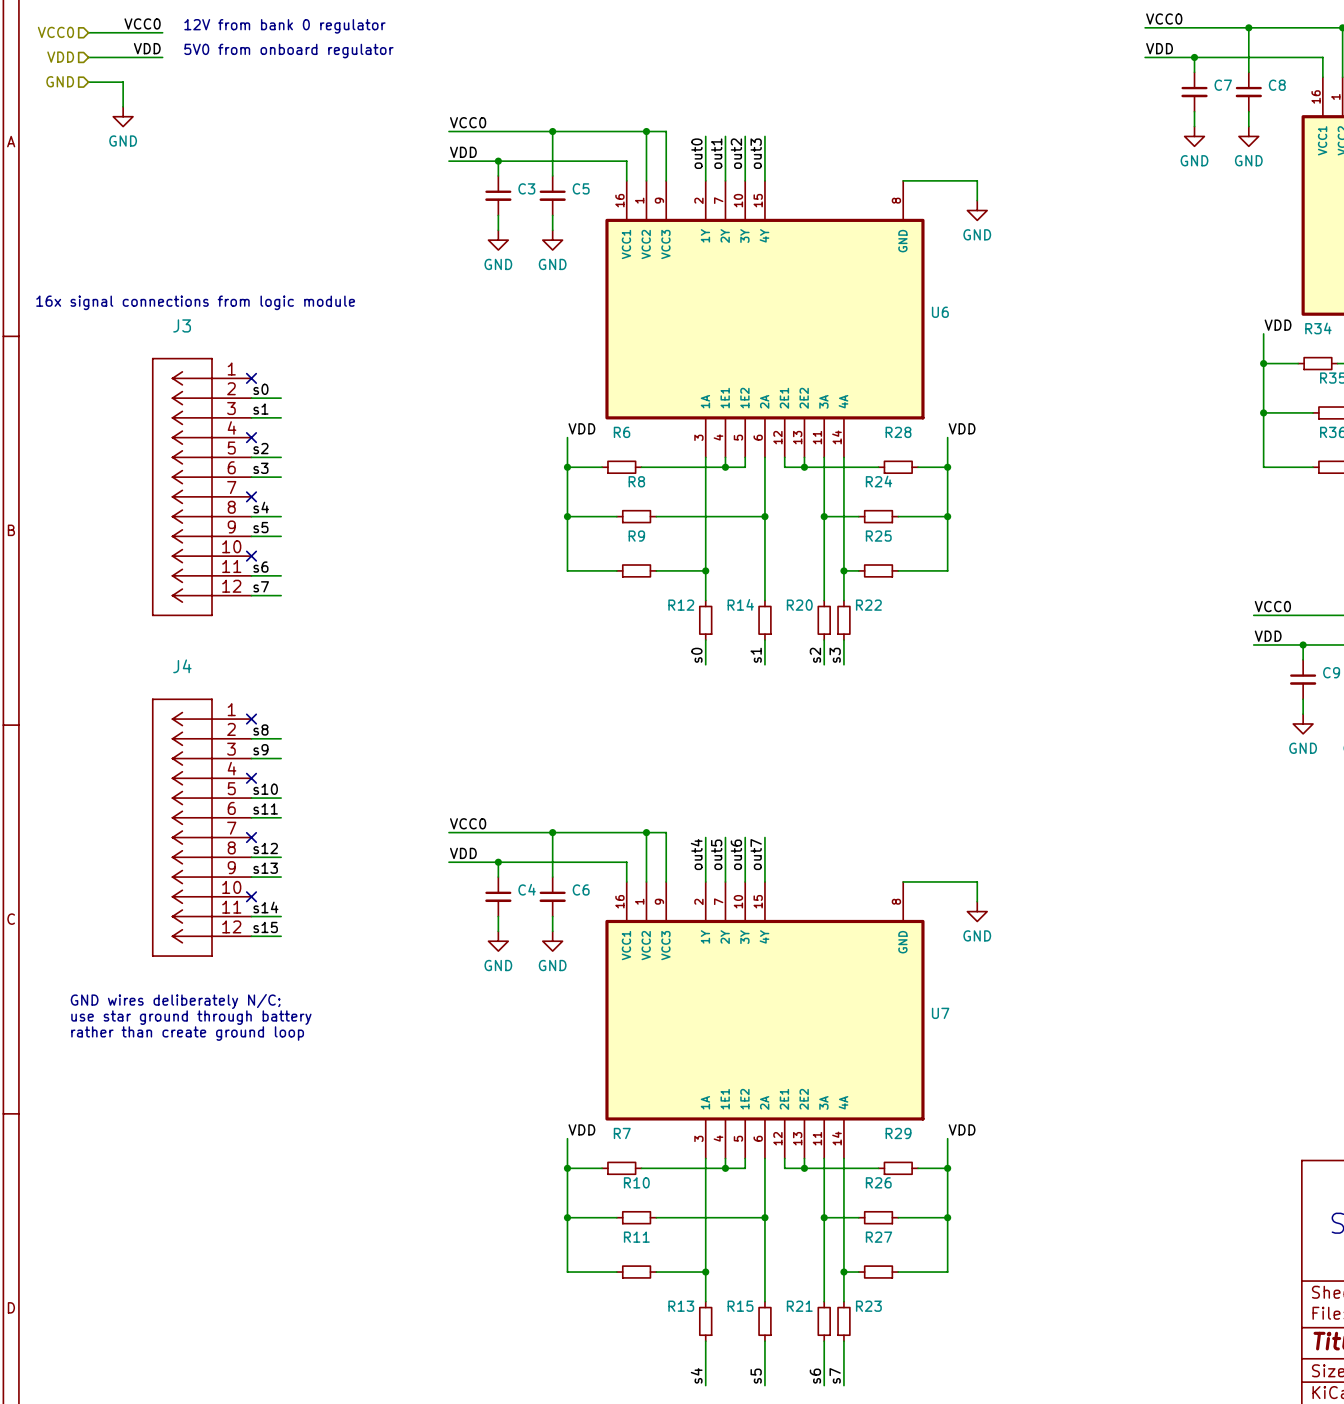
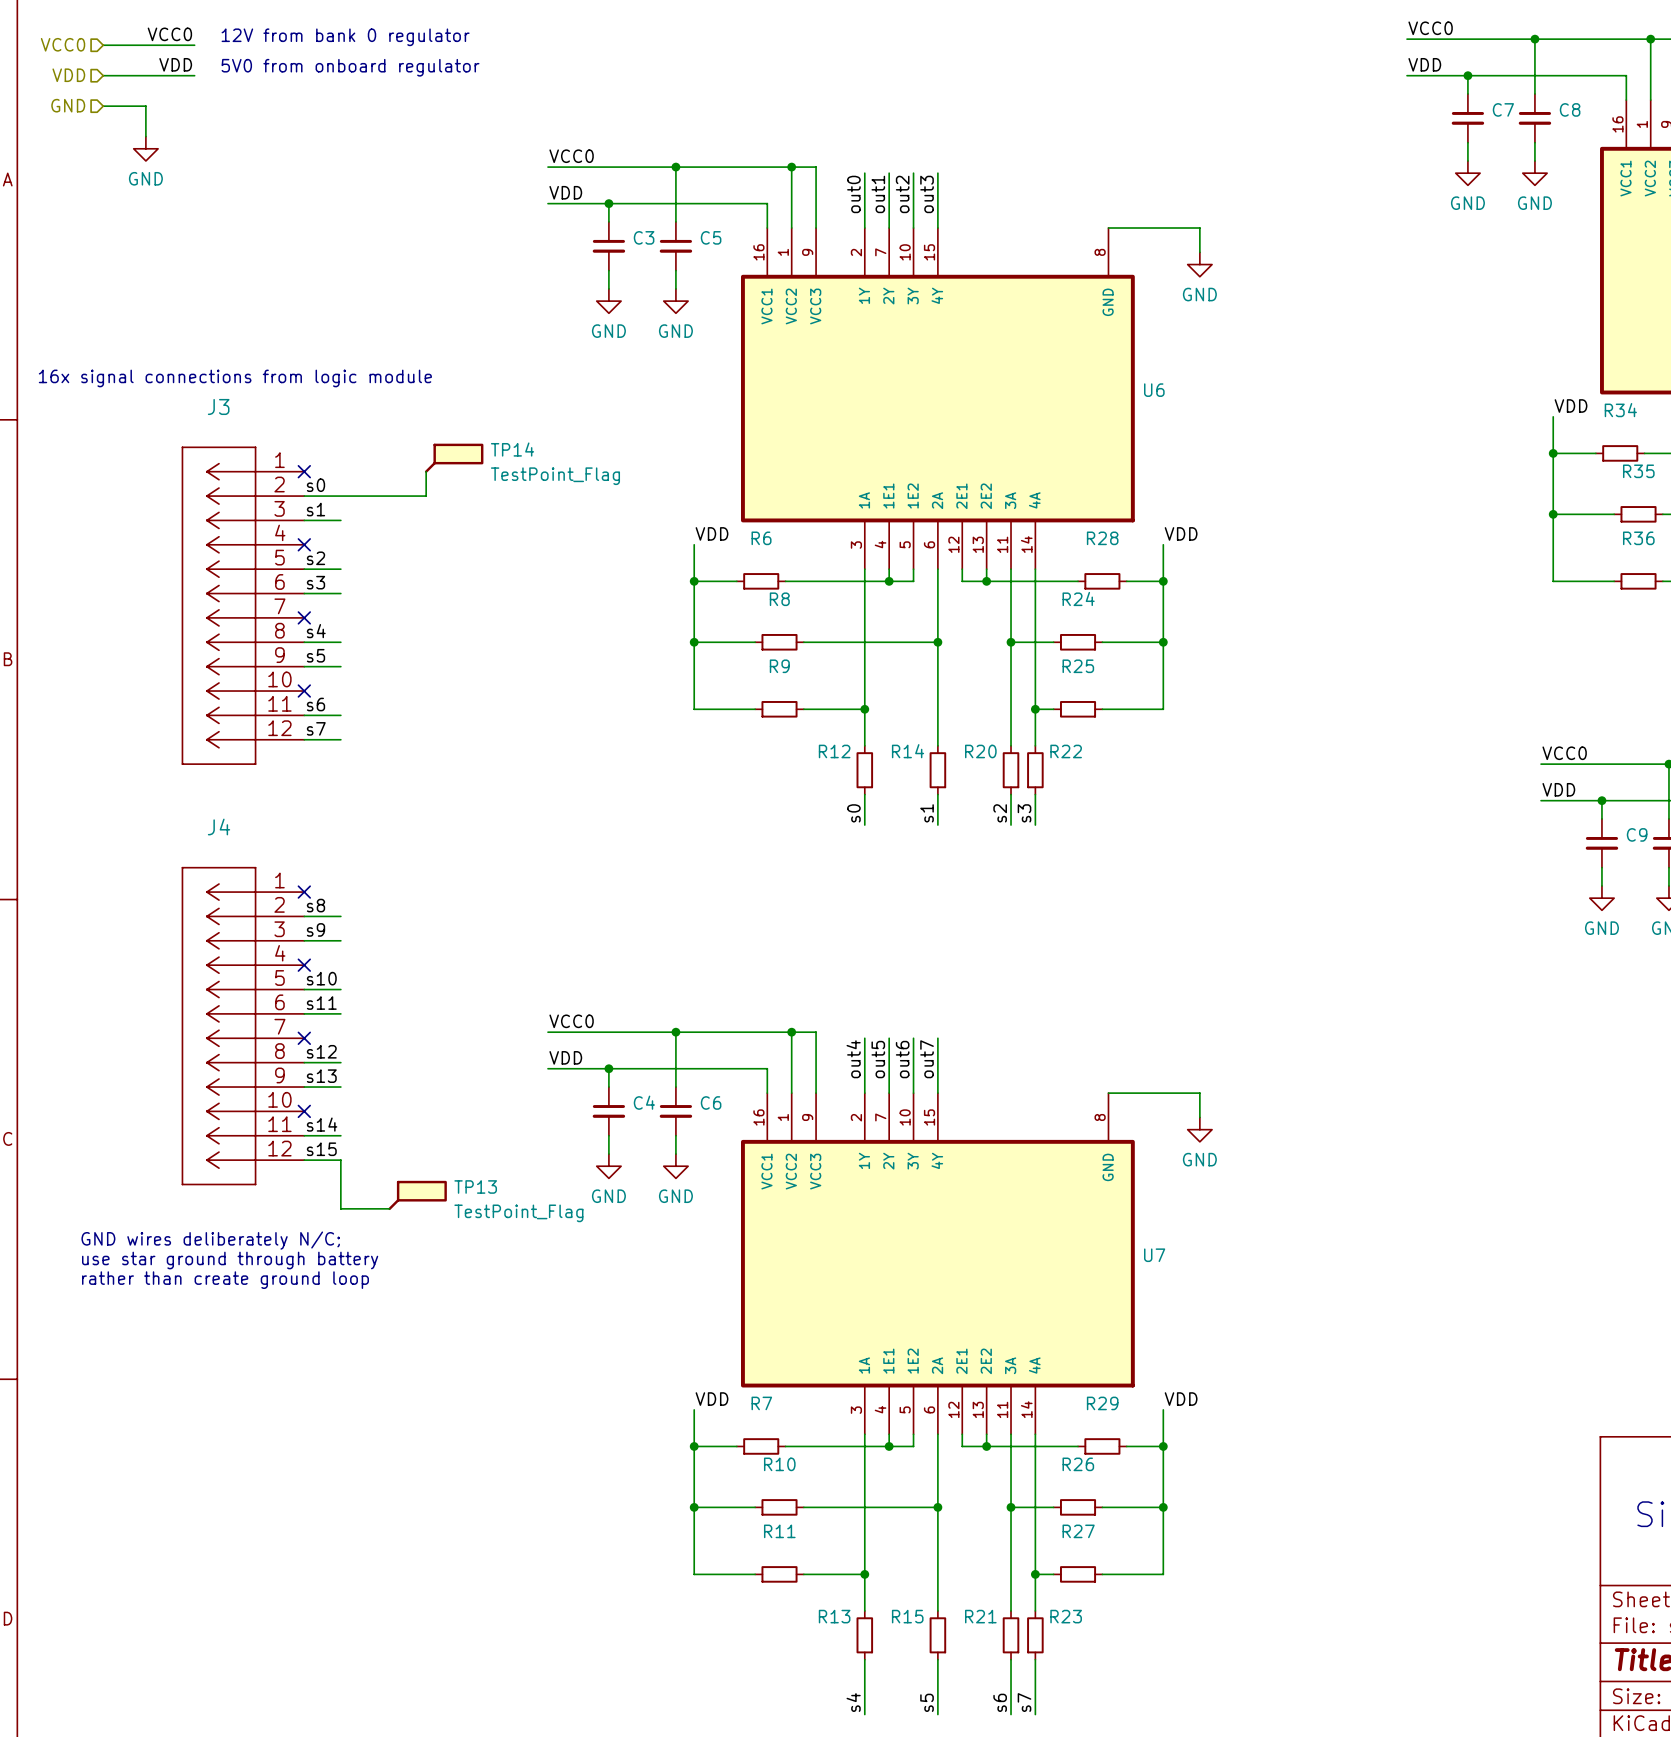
TP14: none -> TestPoint_Flag (454, 458)
wire: none -> (426, 471) (426, 496) (340, 496)
wire: none -> (340, 1160) (340, 1208) (389, 1208)
TP13: none -> TestPoint_Flag (417, 1195)

